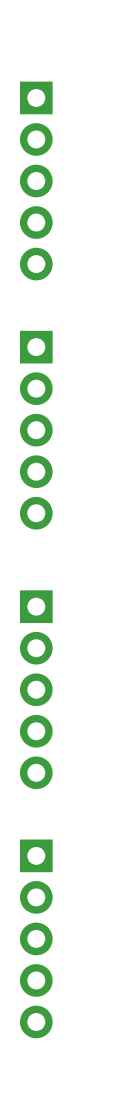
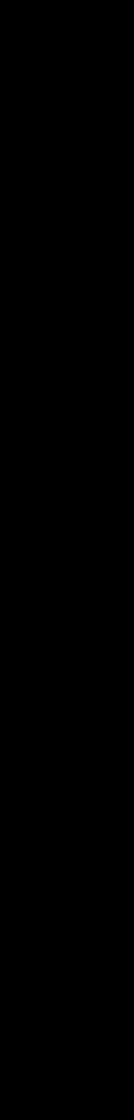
part: (36, 181) -> none
part: (36, 430) -> none
part: (36, 689) -> none
part: (36, 938) -> none

